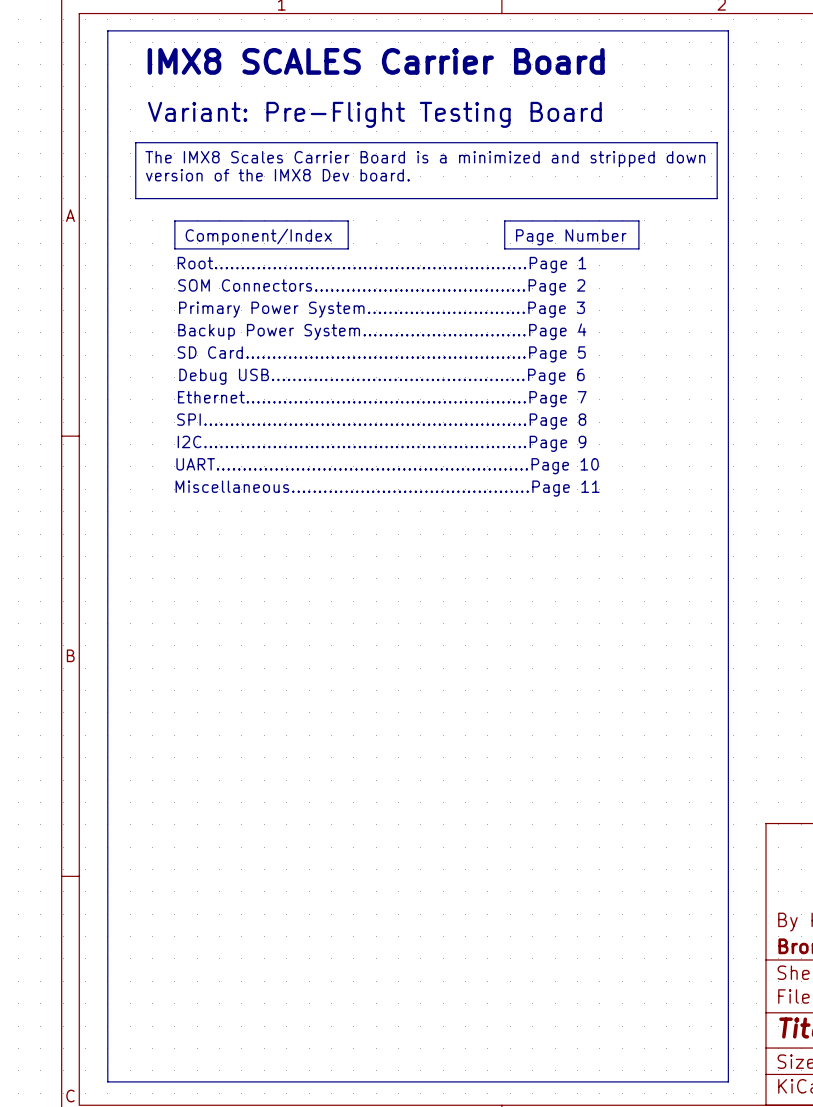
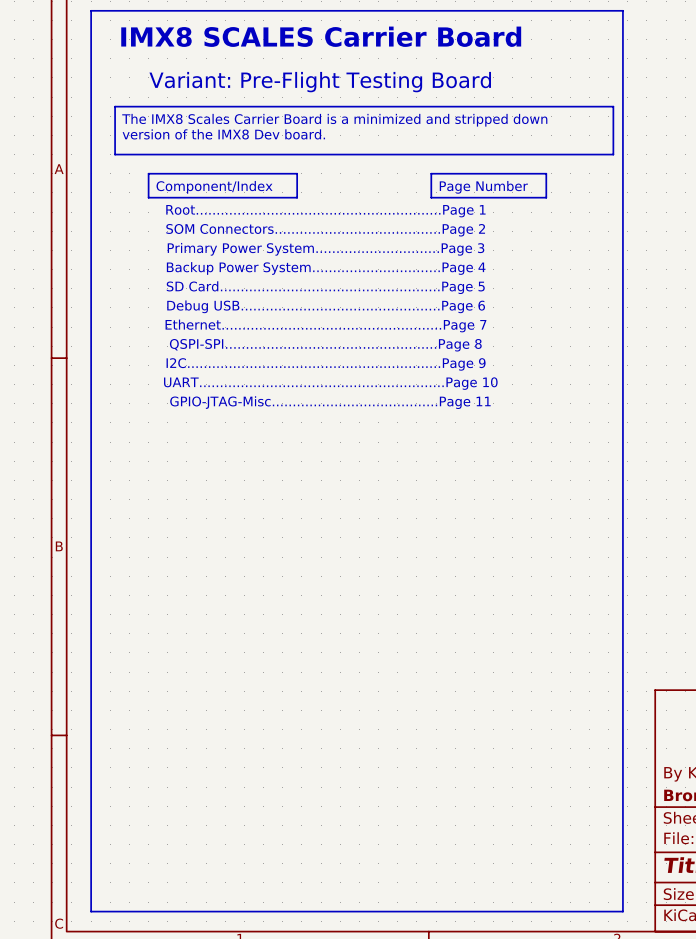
text: SPI.............................................................Page 8 (381, 421) -> QSPI-SPI...................................................Page 8 (325, 345)
text: Miscellaneous.............................................Page 11 (387, 488) -> GPIO-JTAG-Misc........................................Page 11 (330, 402)

